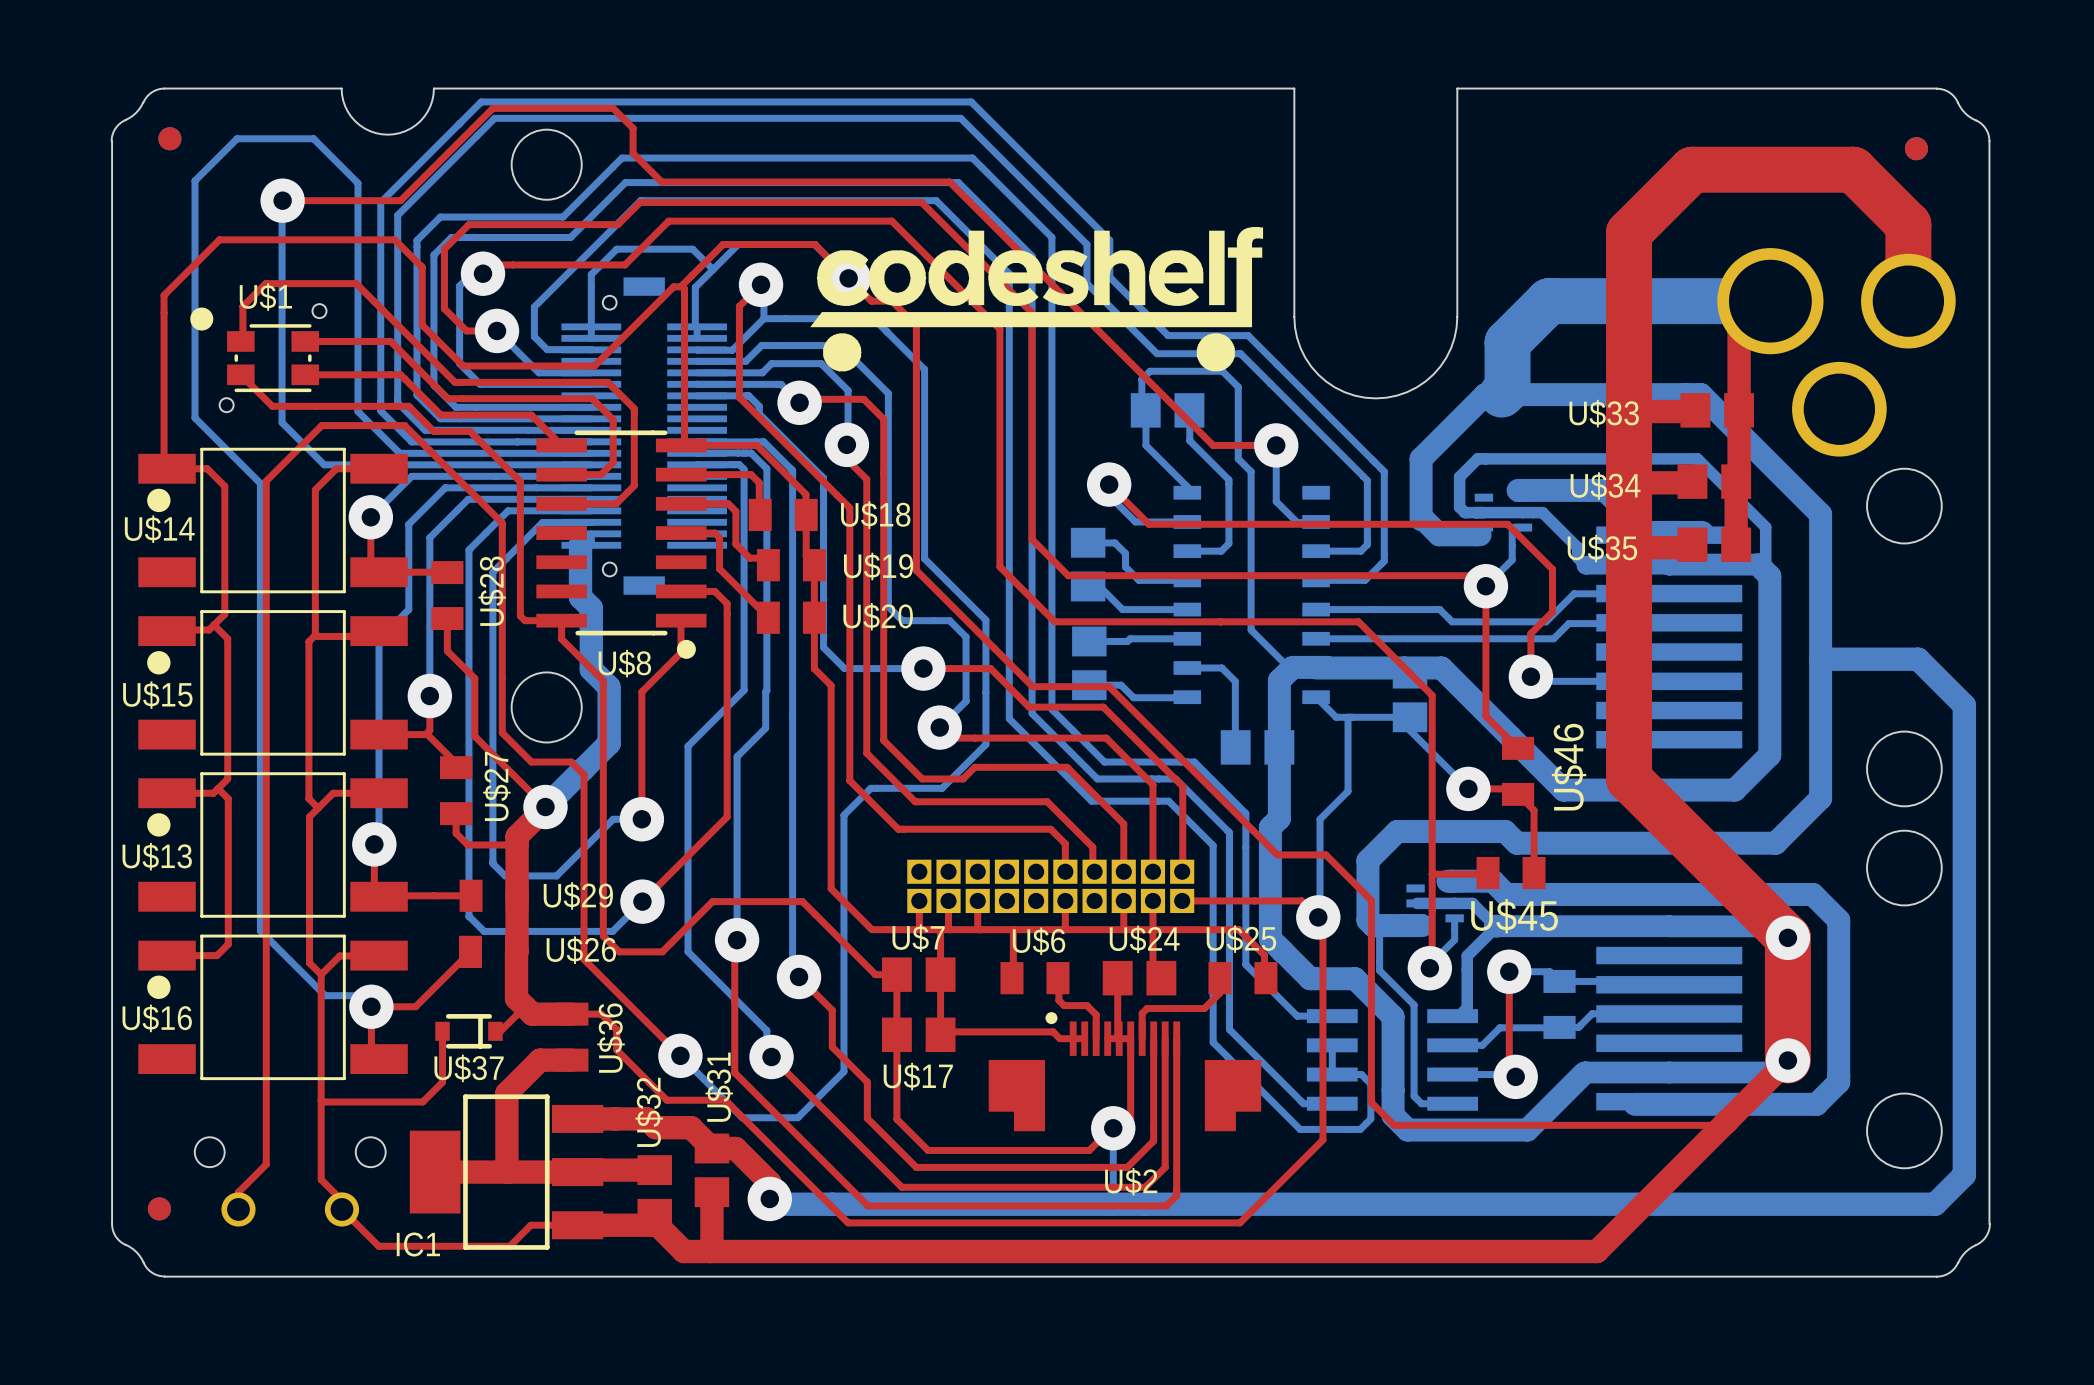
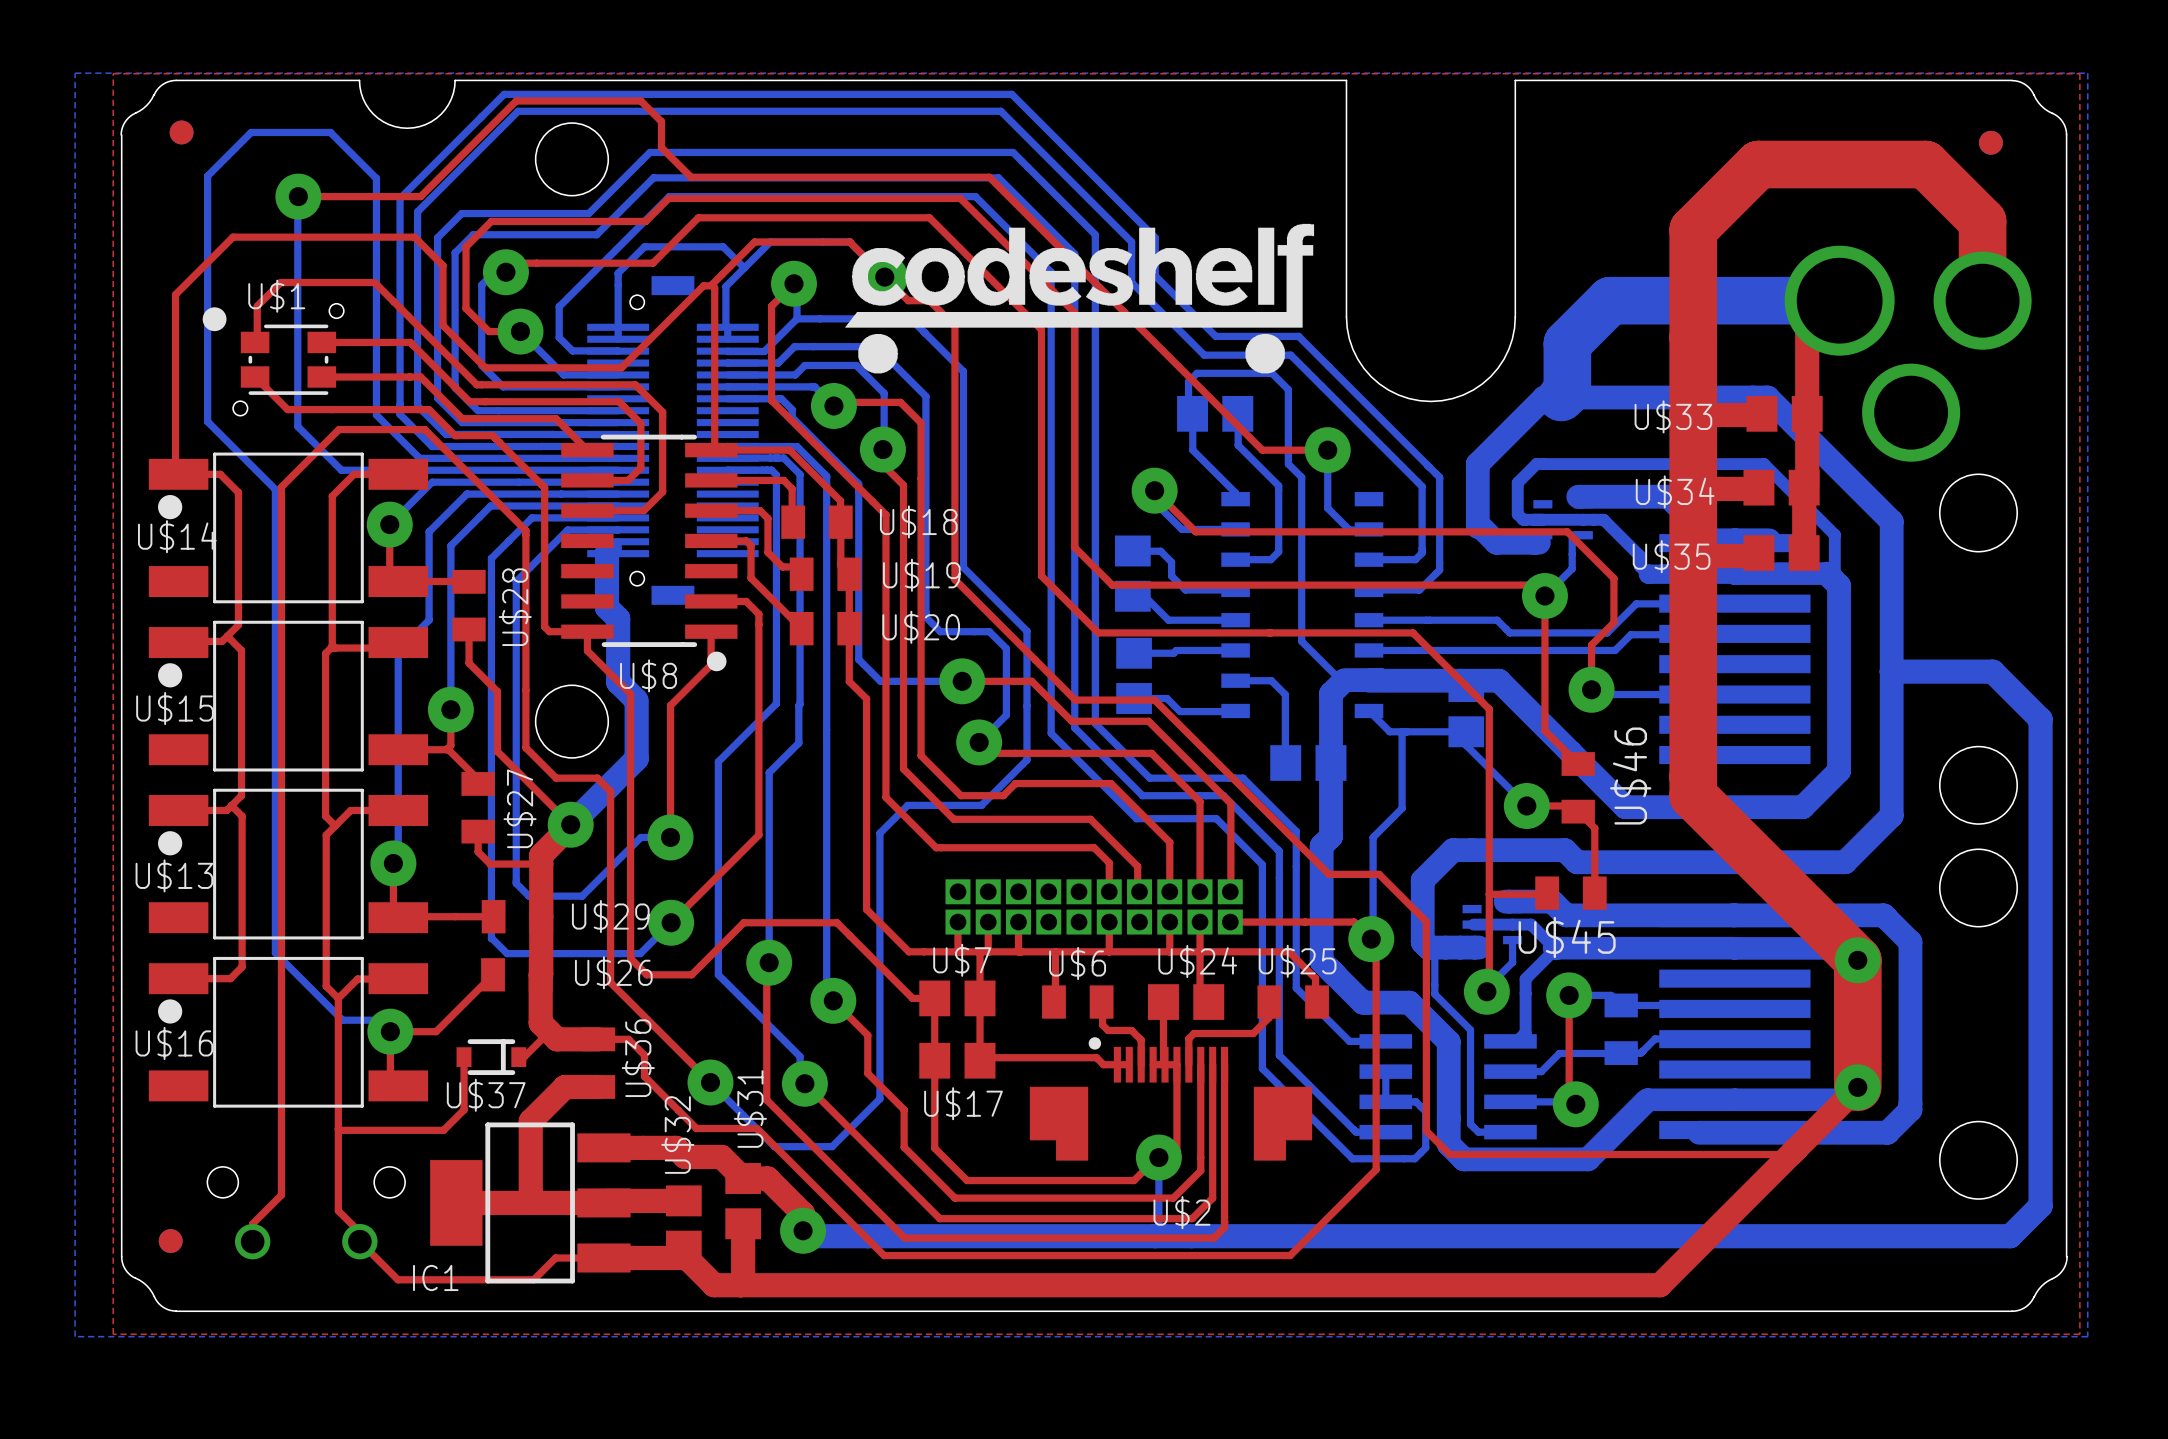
bottom zone outline: none -> (75, 73) (2087, 73) (2087, 1336) (75, 1336) (75, 73)
top zone outline: none -> (113, 73) (2079, 73) (2079, 1334) (113, 1334) (113, 73)

